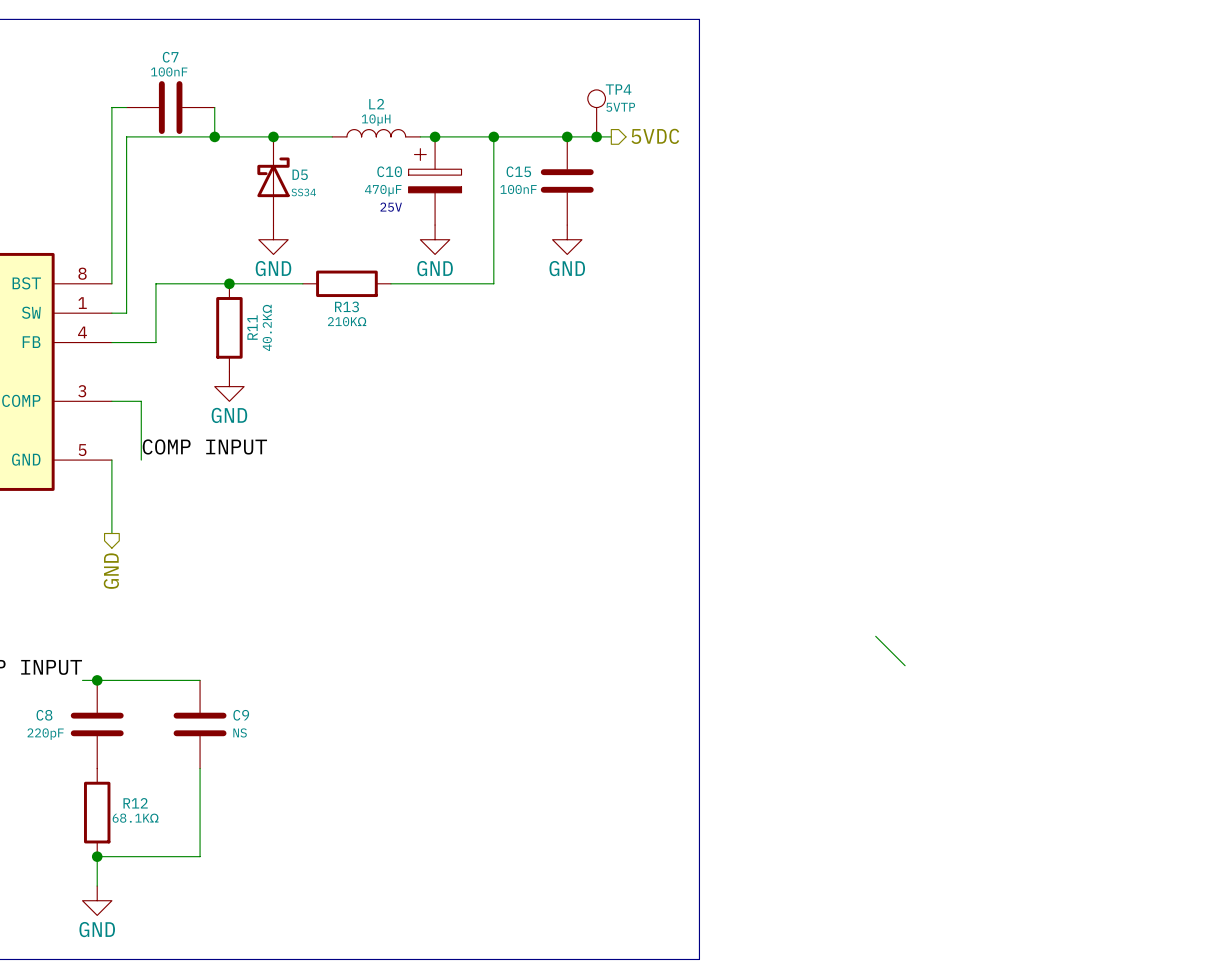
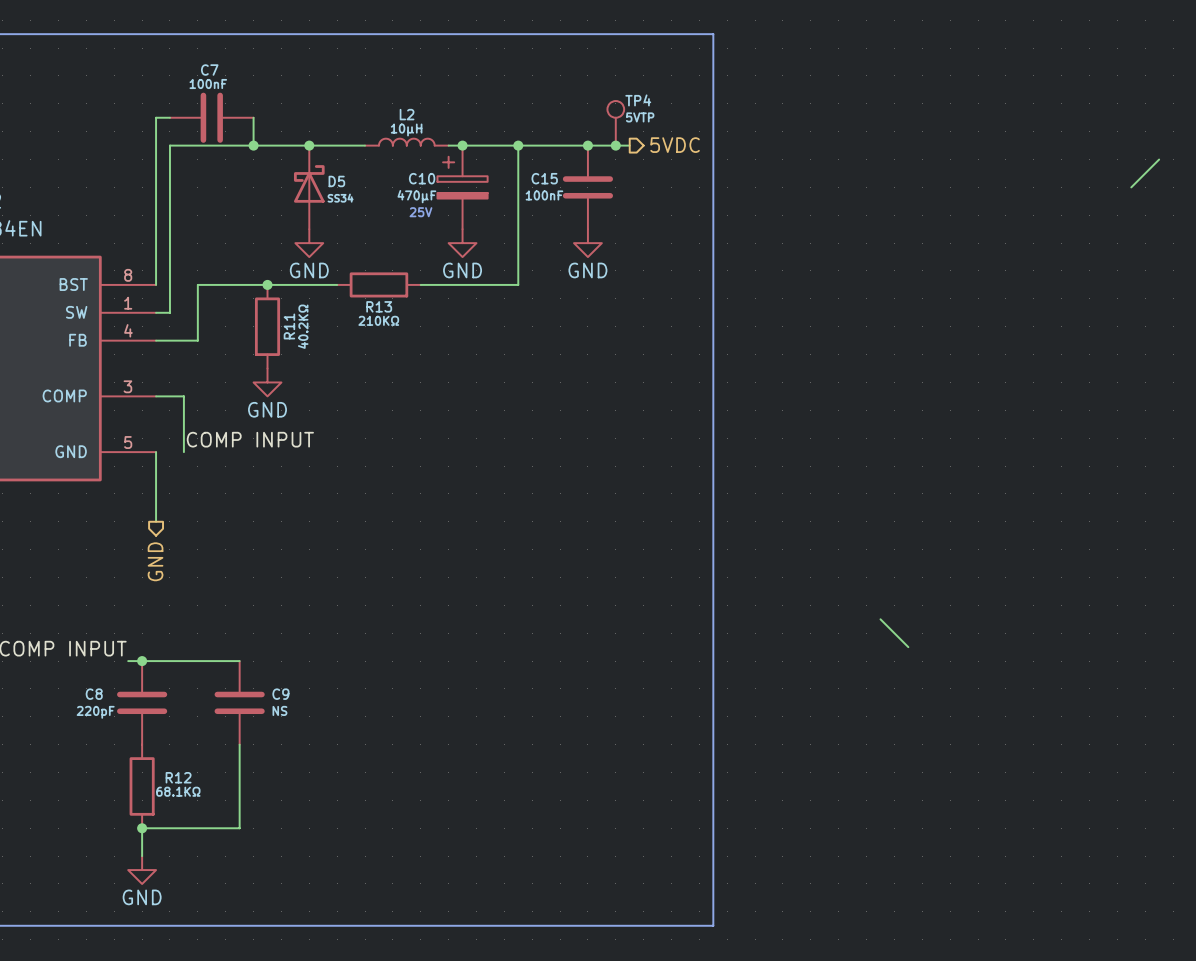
wire: none -> (1159, 159) (1131, 187)

